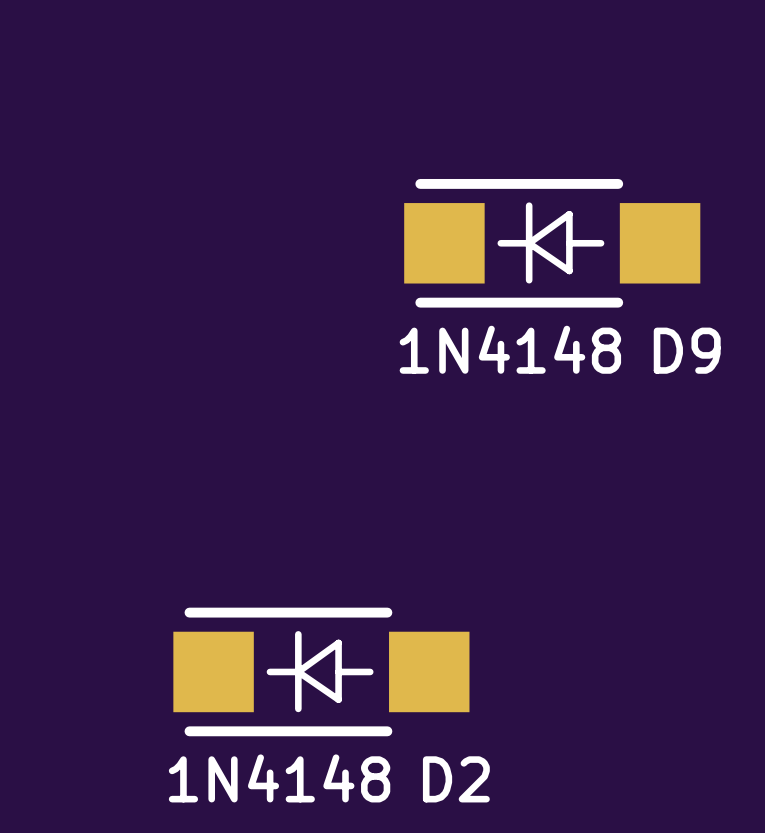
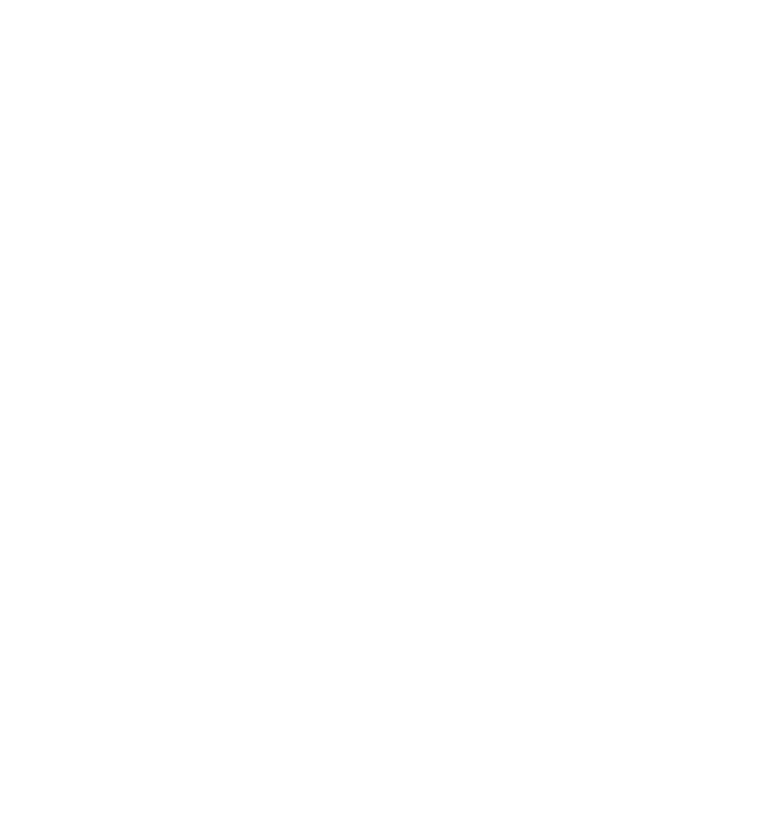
D9: 1N4148 (552, 243) -> none
D2: 1N4148 (321, 671) -> none

